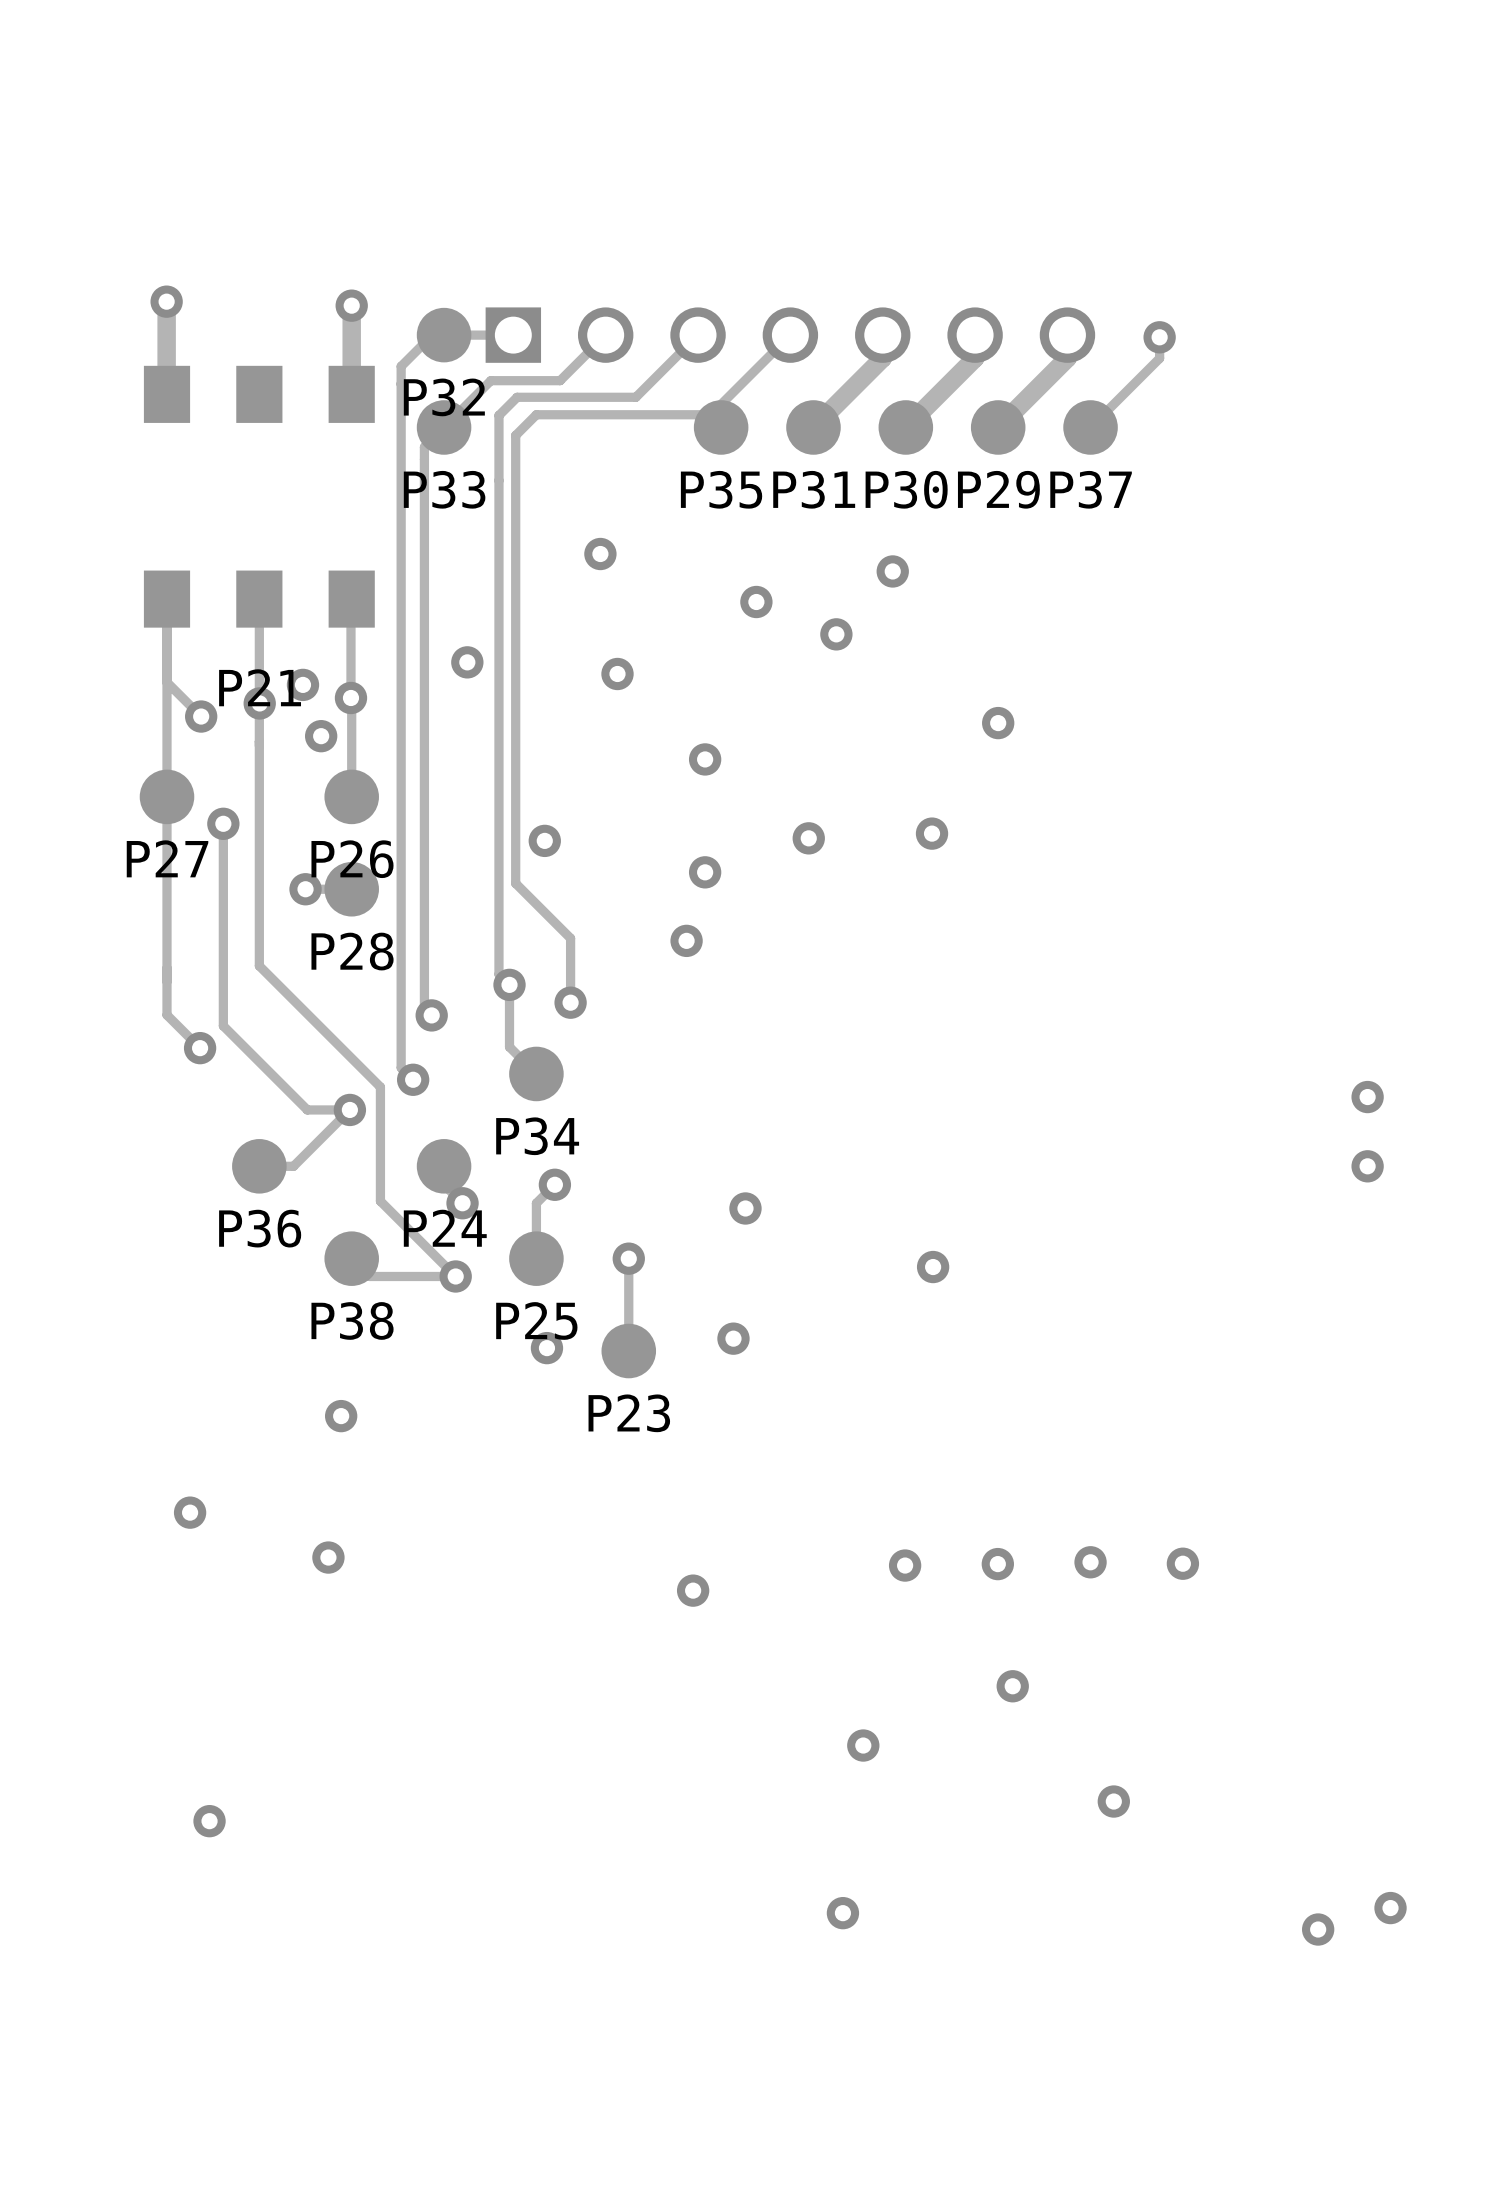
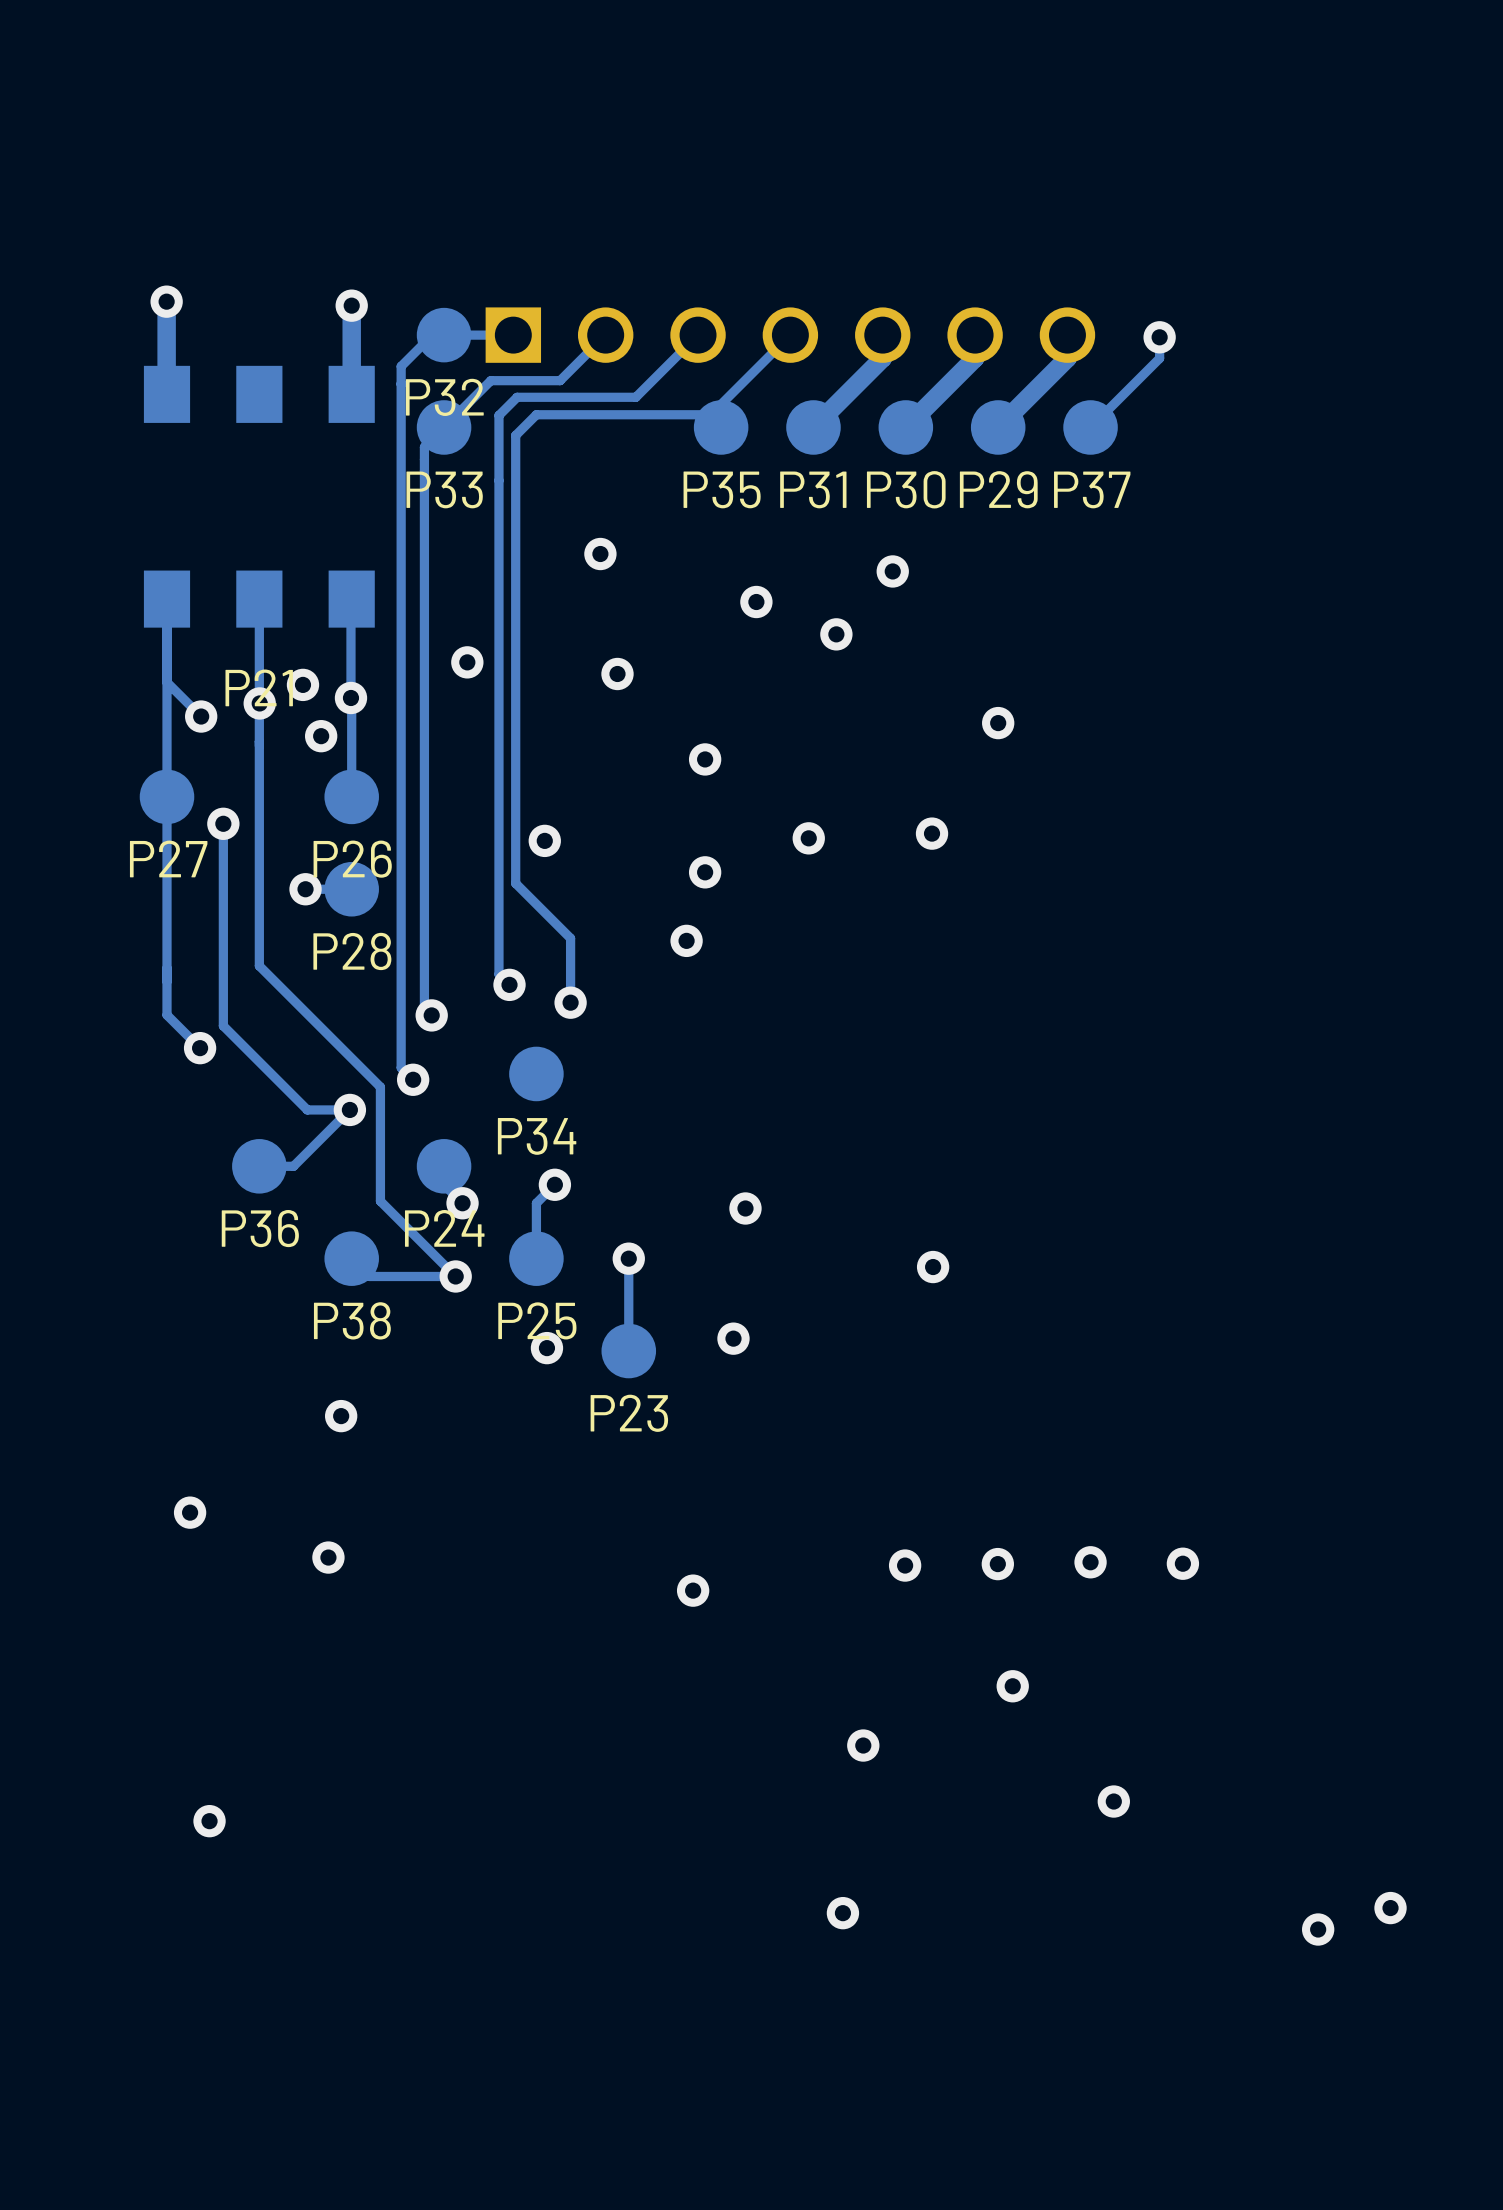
track: (509, 984) (509, 1047) (536, 1073) -> none
via: (1367, 1097) -> none
via: (1367, 1166) -> none

